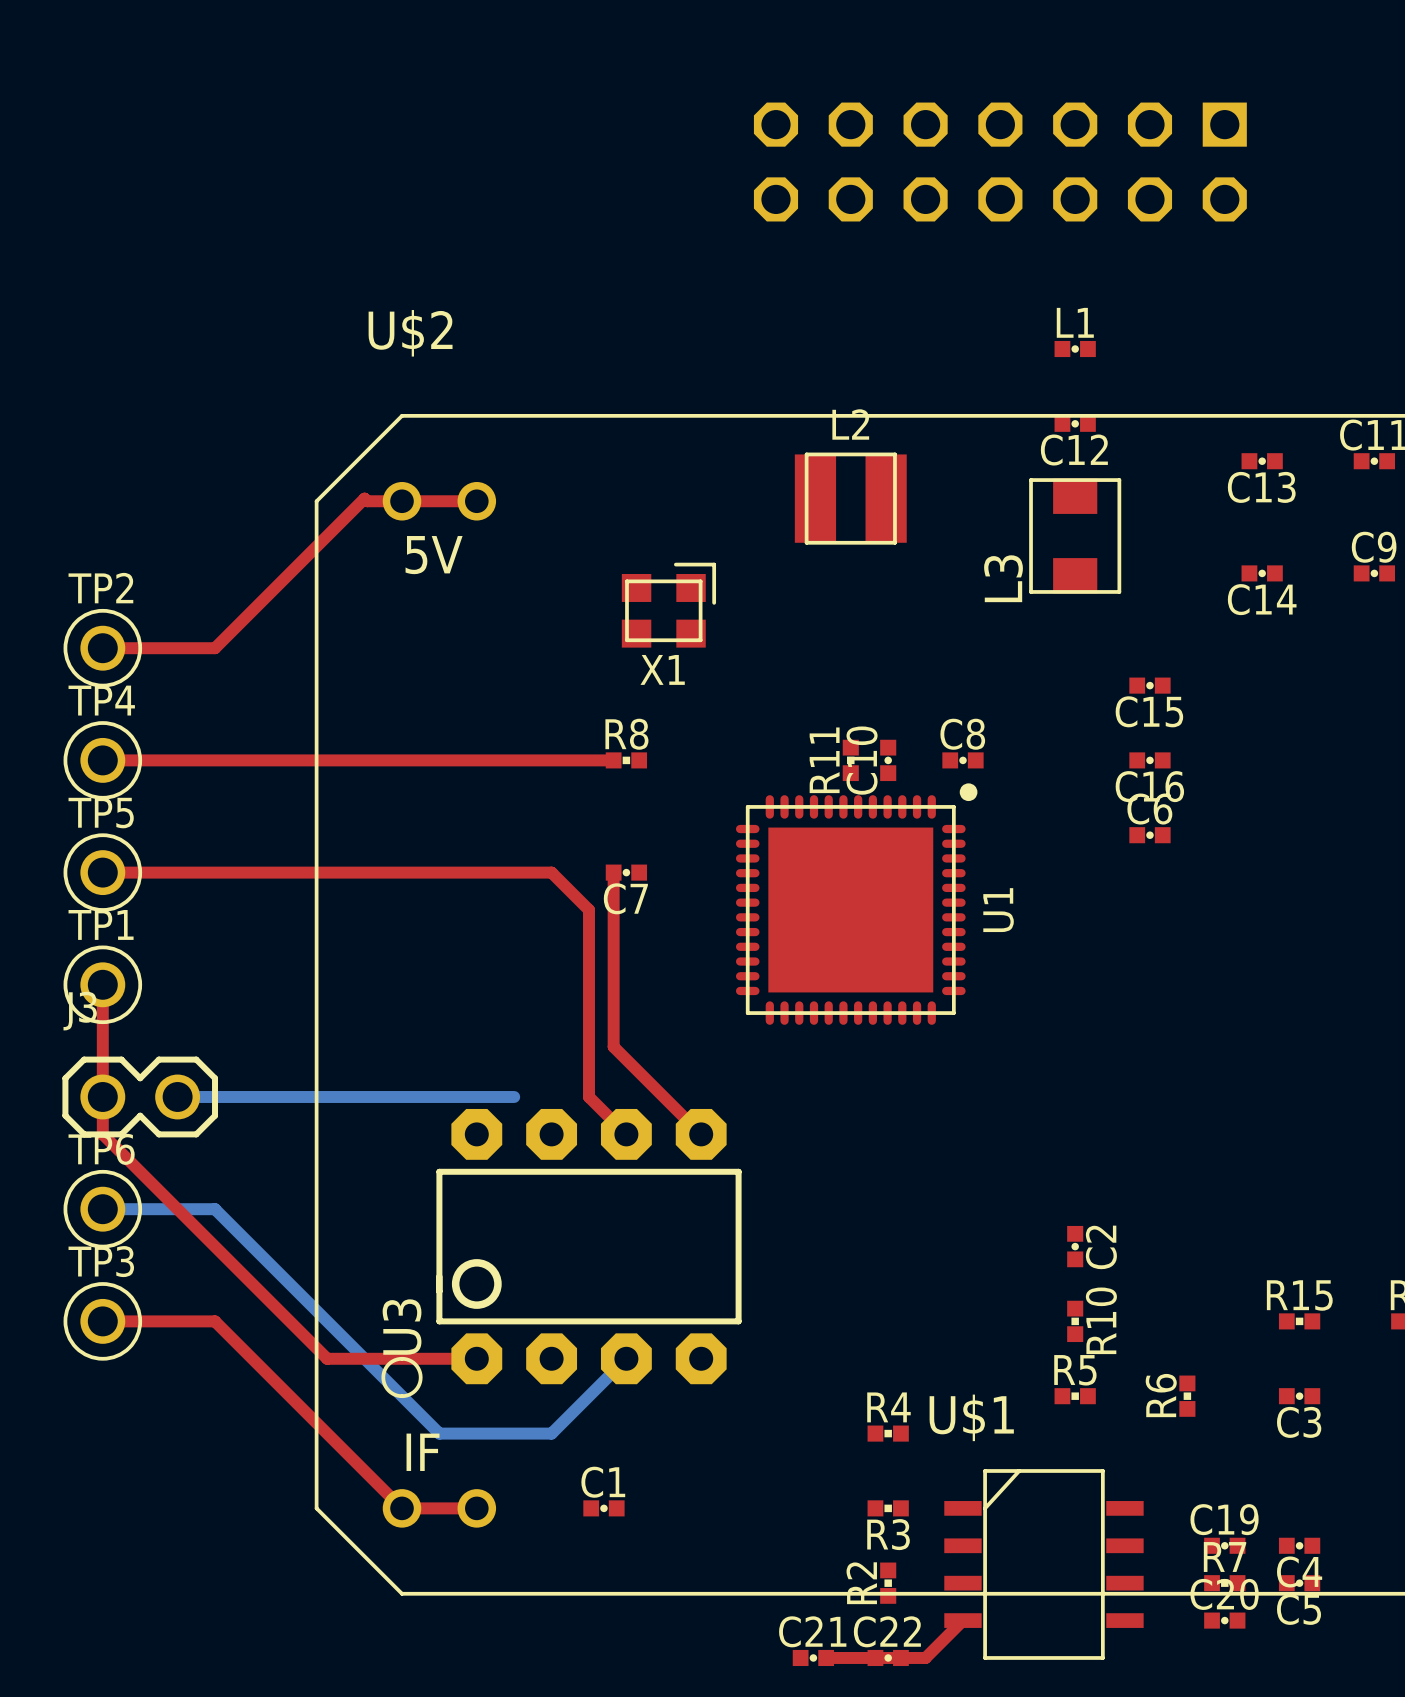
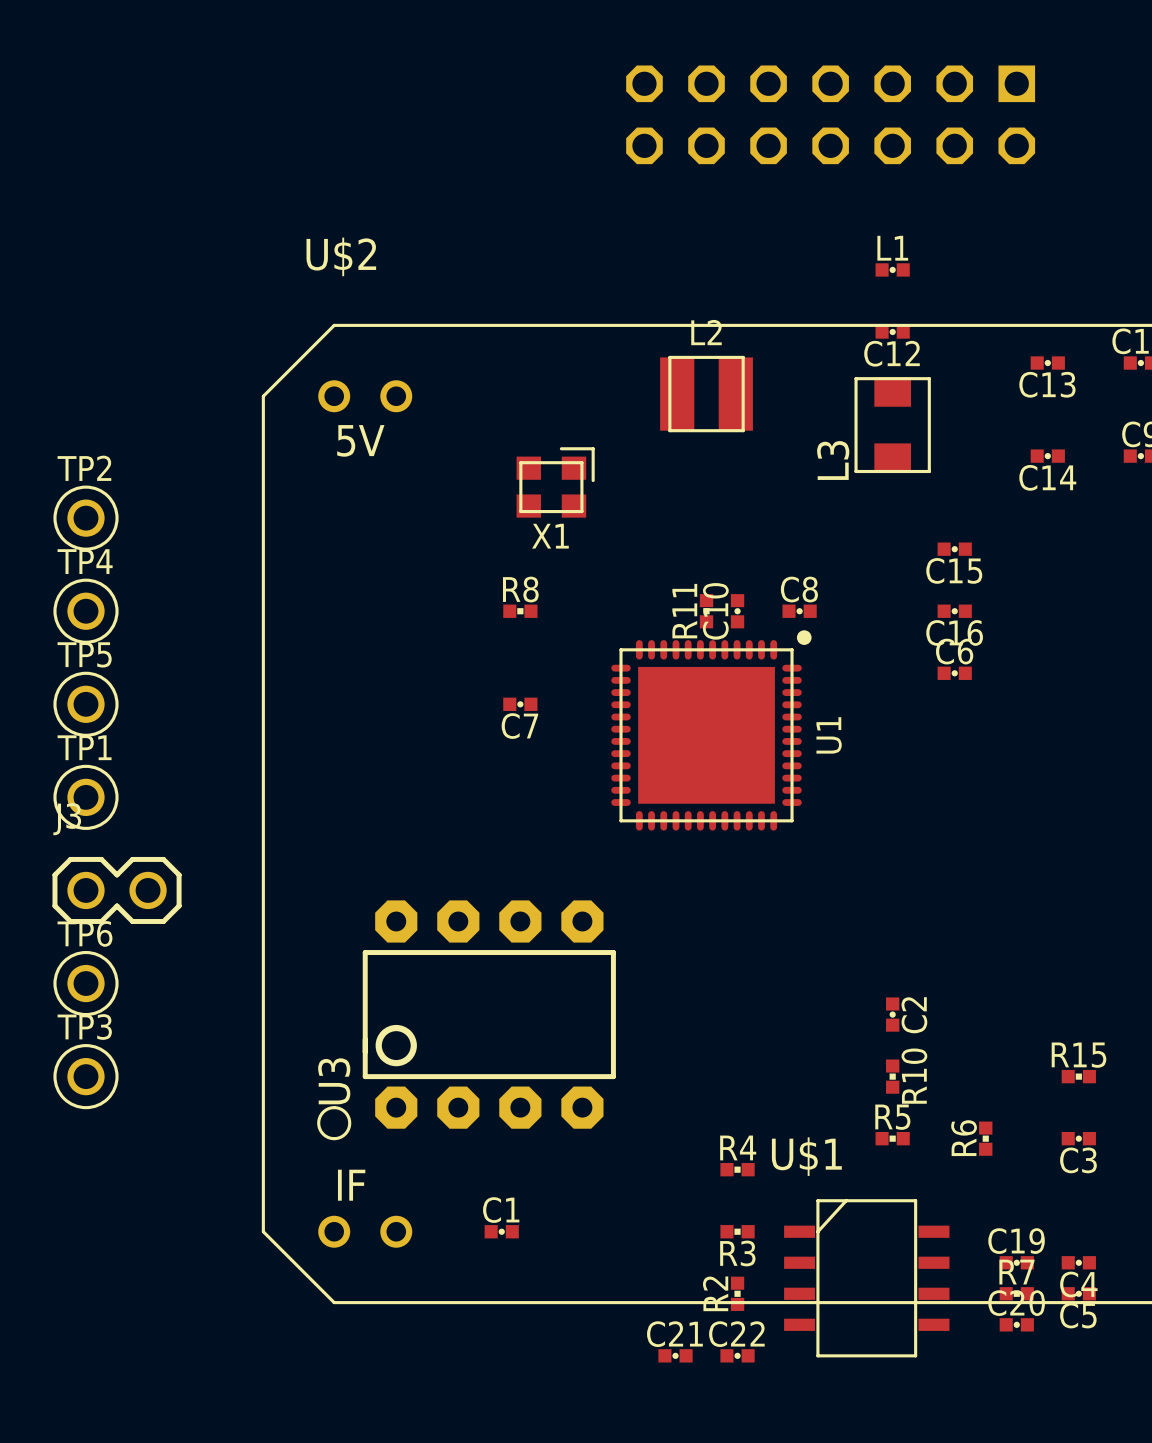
top track: (476, 501) (367, 501) (364, 498) (215, 648) (102, 648) -> none
top track: (102, 760) (613, 760) -> none
top track: (102, 872) (551, 872) (589, 910) (589, 1096) (626, 1134) -> none
top track: (613, 872) (613, 1046) (701, 1134) -> none
top track: (102, 984) (102, 1134) (327, 1358) (476, 1358) -> none
bottom track: (177, 1096) (514, 1096) -> none
bottom track: (102, 1209) (215, 1209) (439, 1433) (551, 1433) (626, 1358) -> none
top track: (102, 1321) (215, 1321) (402, 1508) (476, 1508) -> none
top track: (962, 1620) (925, 1657) (826, 1657) -> none

